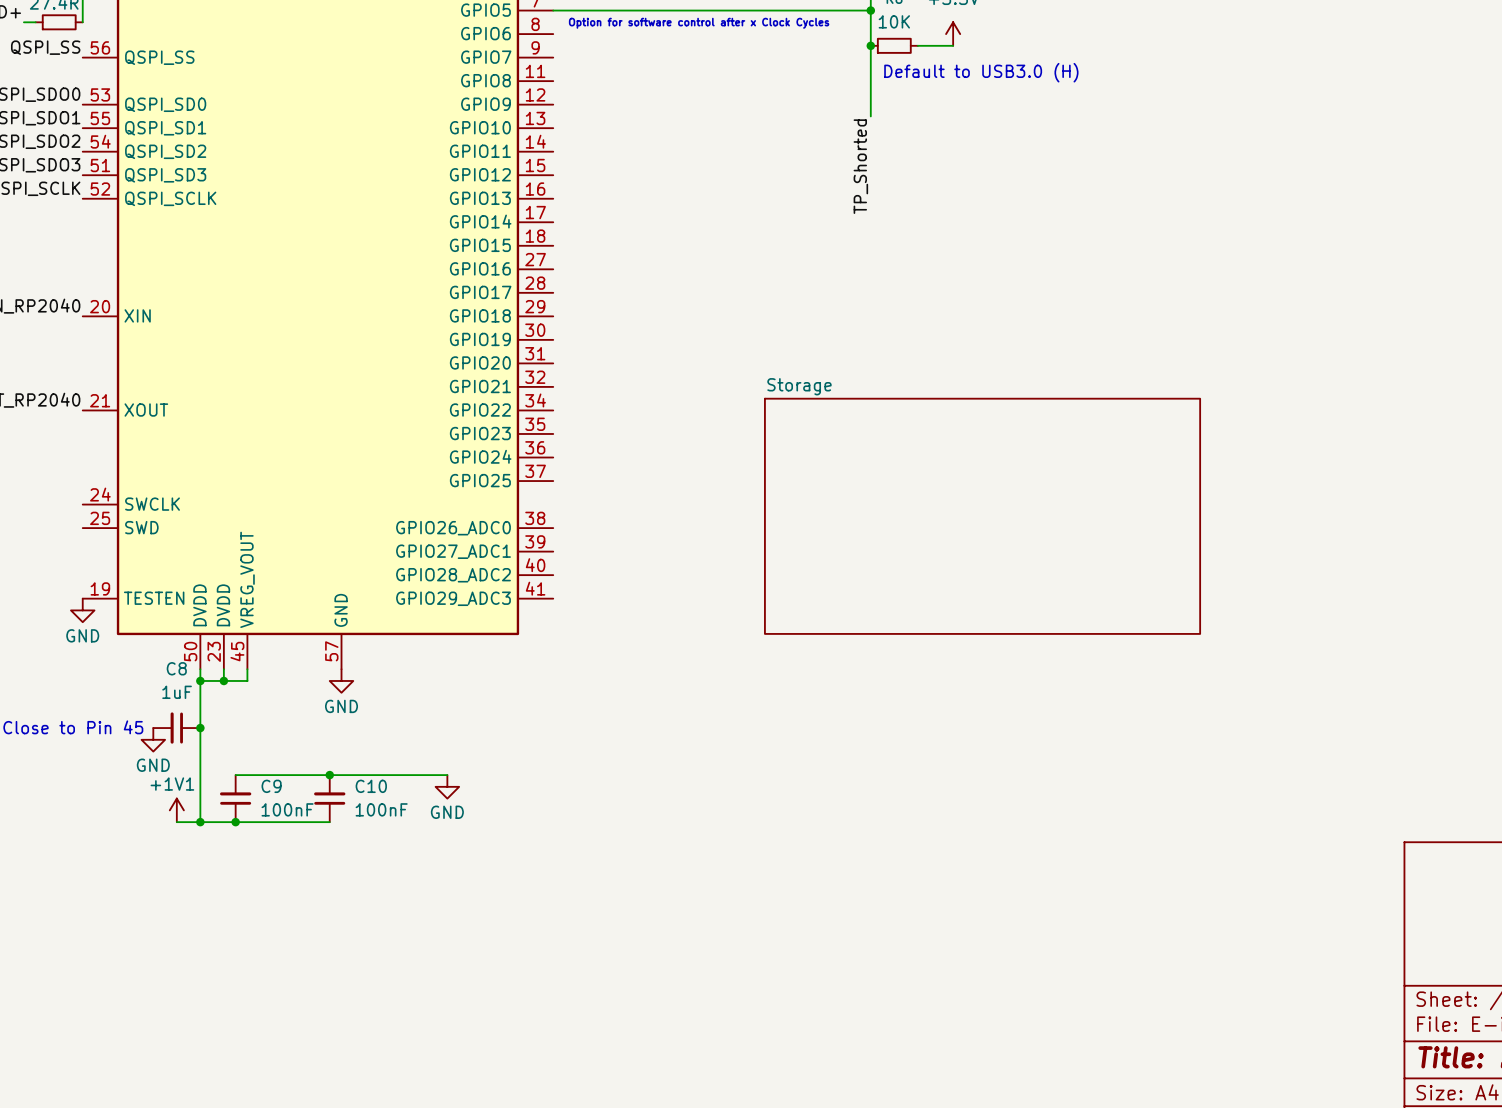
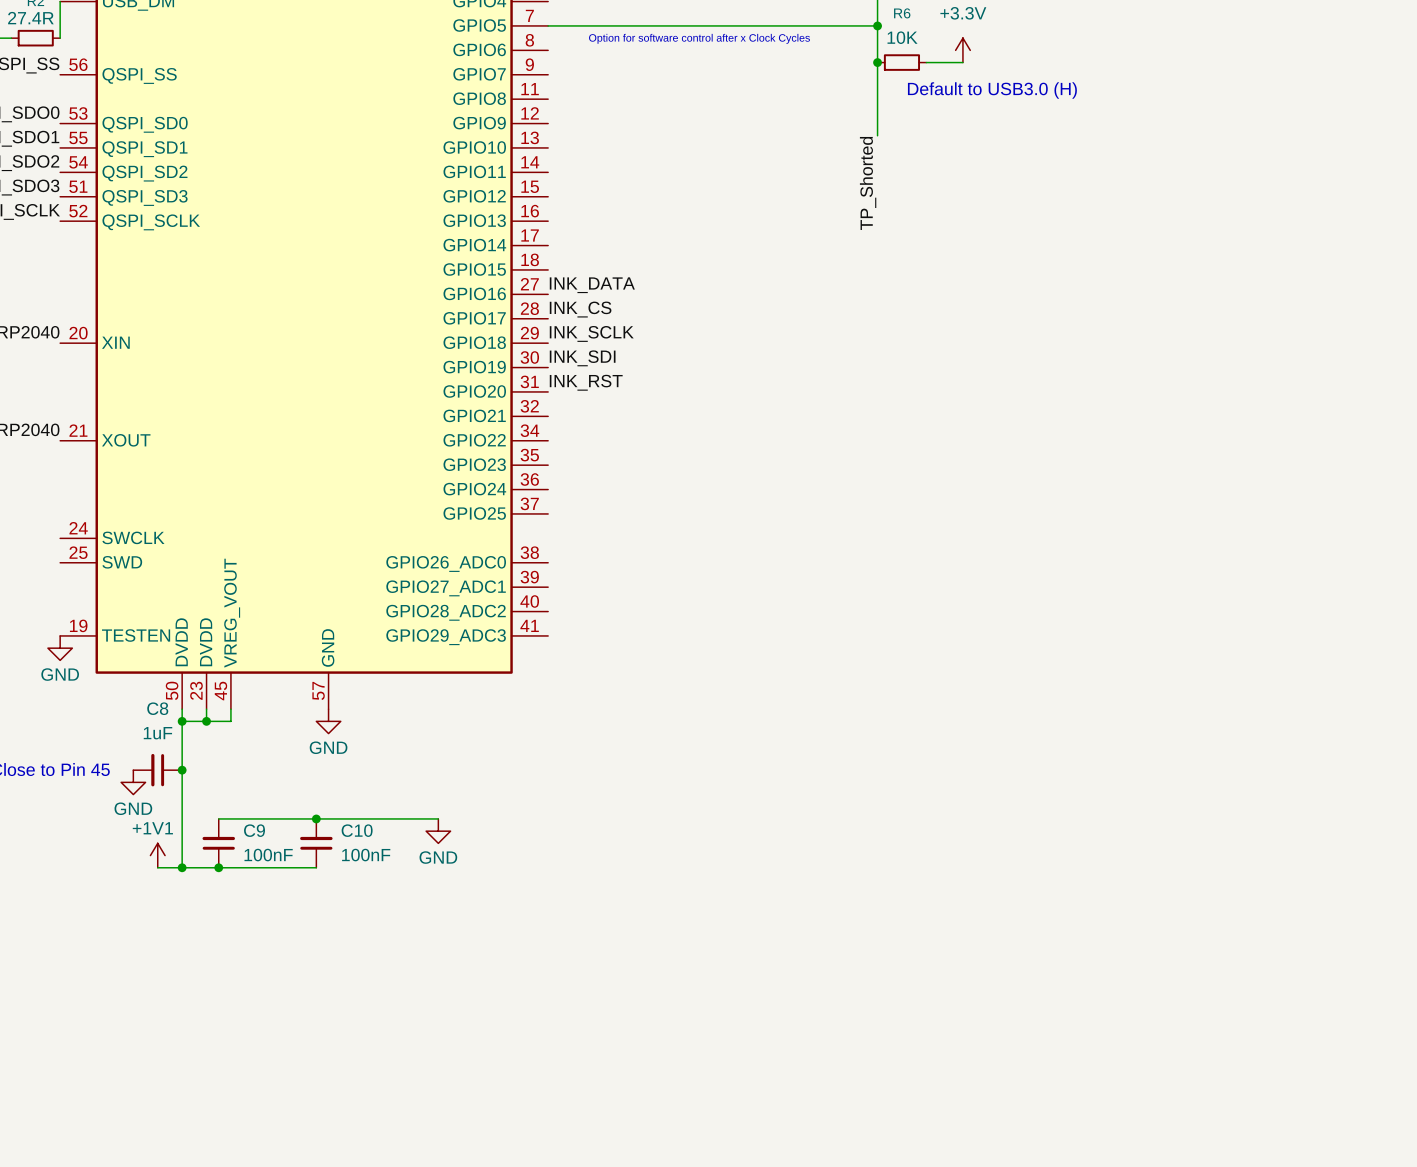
label: none -> INK_DATA (592, 285)
label: none -> INK_CS (580, 309)
label: none -> INK_SCLK (591, 333)
label: none -> INK_SDI (582, 358)
label: none -> INK_RST (586, 382)
sheet Storage: (982, 516) -> none

